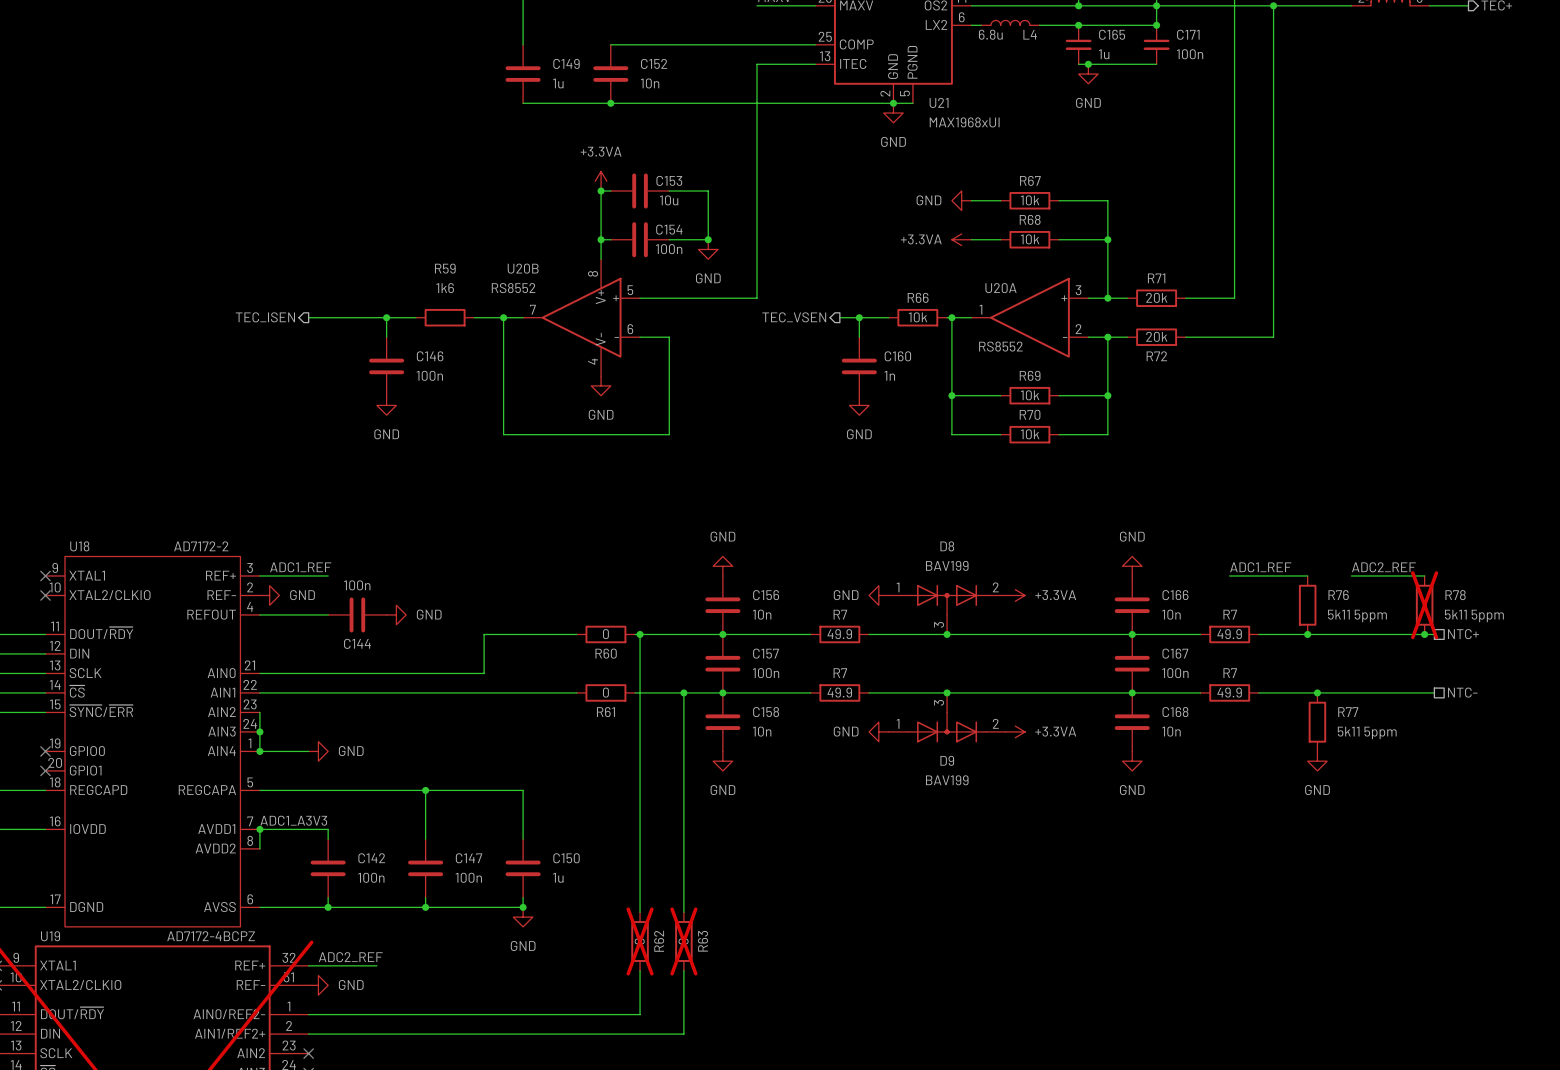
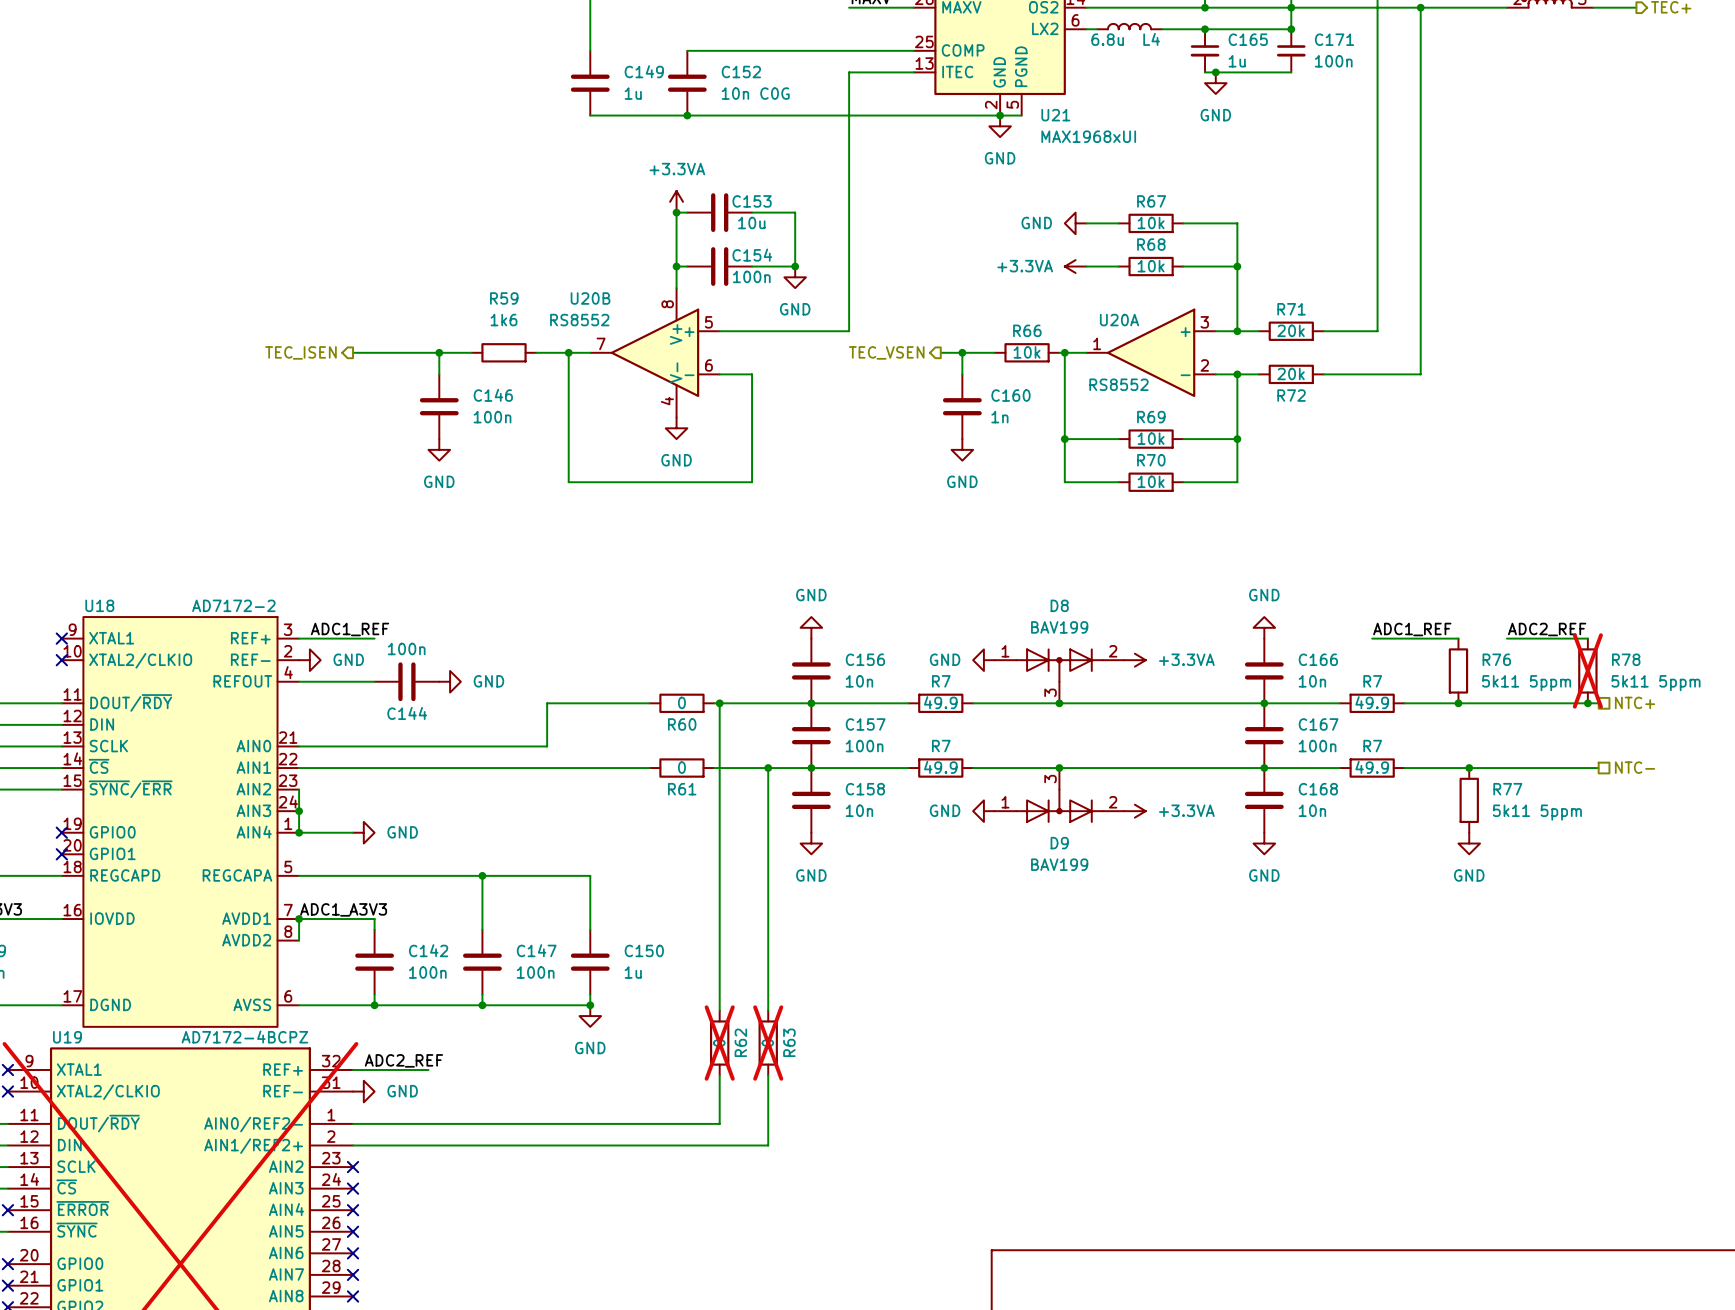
C152 value: 10n (650, 83) -> 10n C0G (755, 93)

